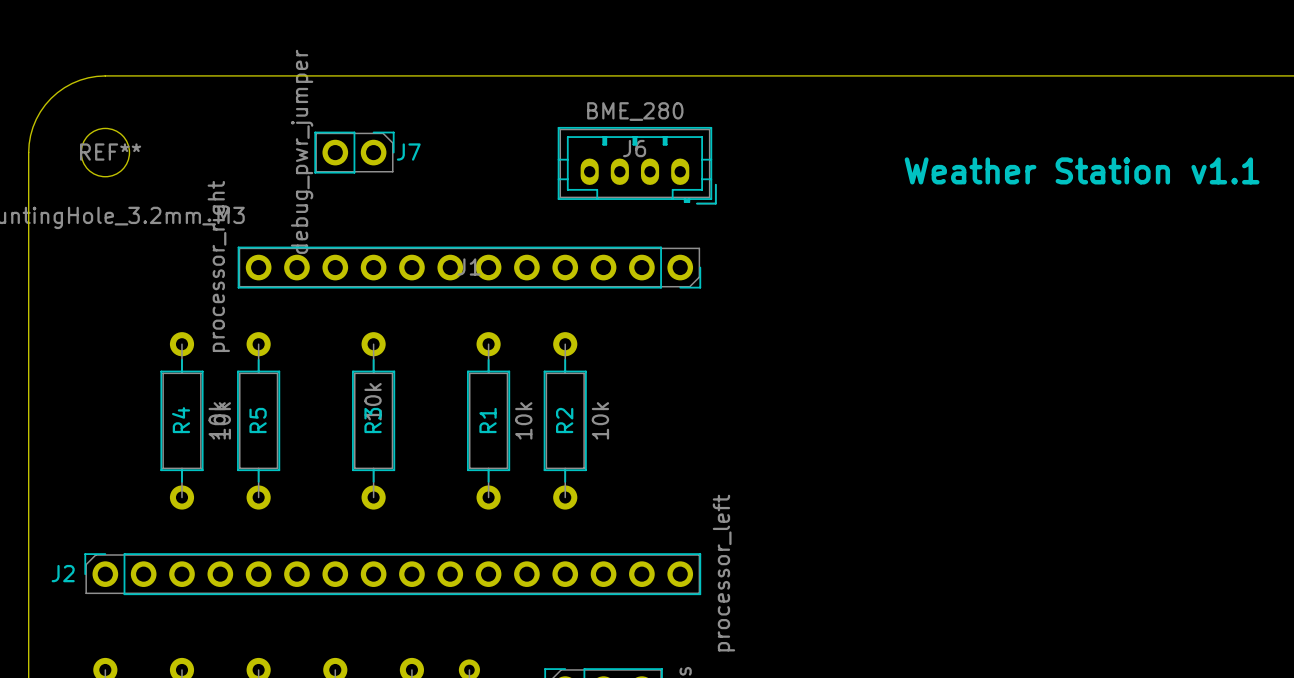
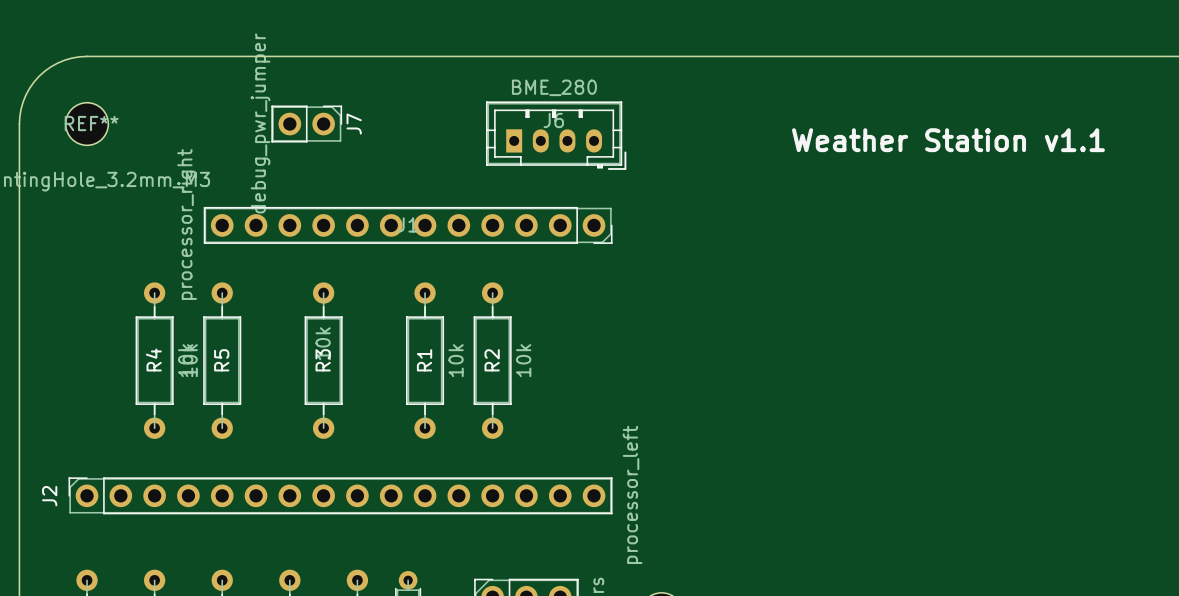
J6 footprint: [557, 126, 717, 205] -> [485, 101, 627, 170]
J7 name rotation: 0° (408, 152) -> 90° counterclockwise (354, 124)
J2 name rotation: 0° (63, 573) -> 90° counterclockwise (49, 496)

